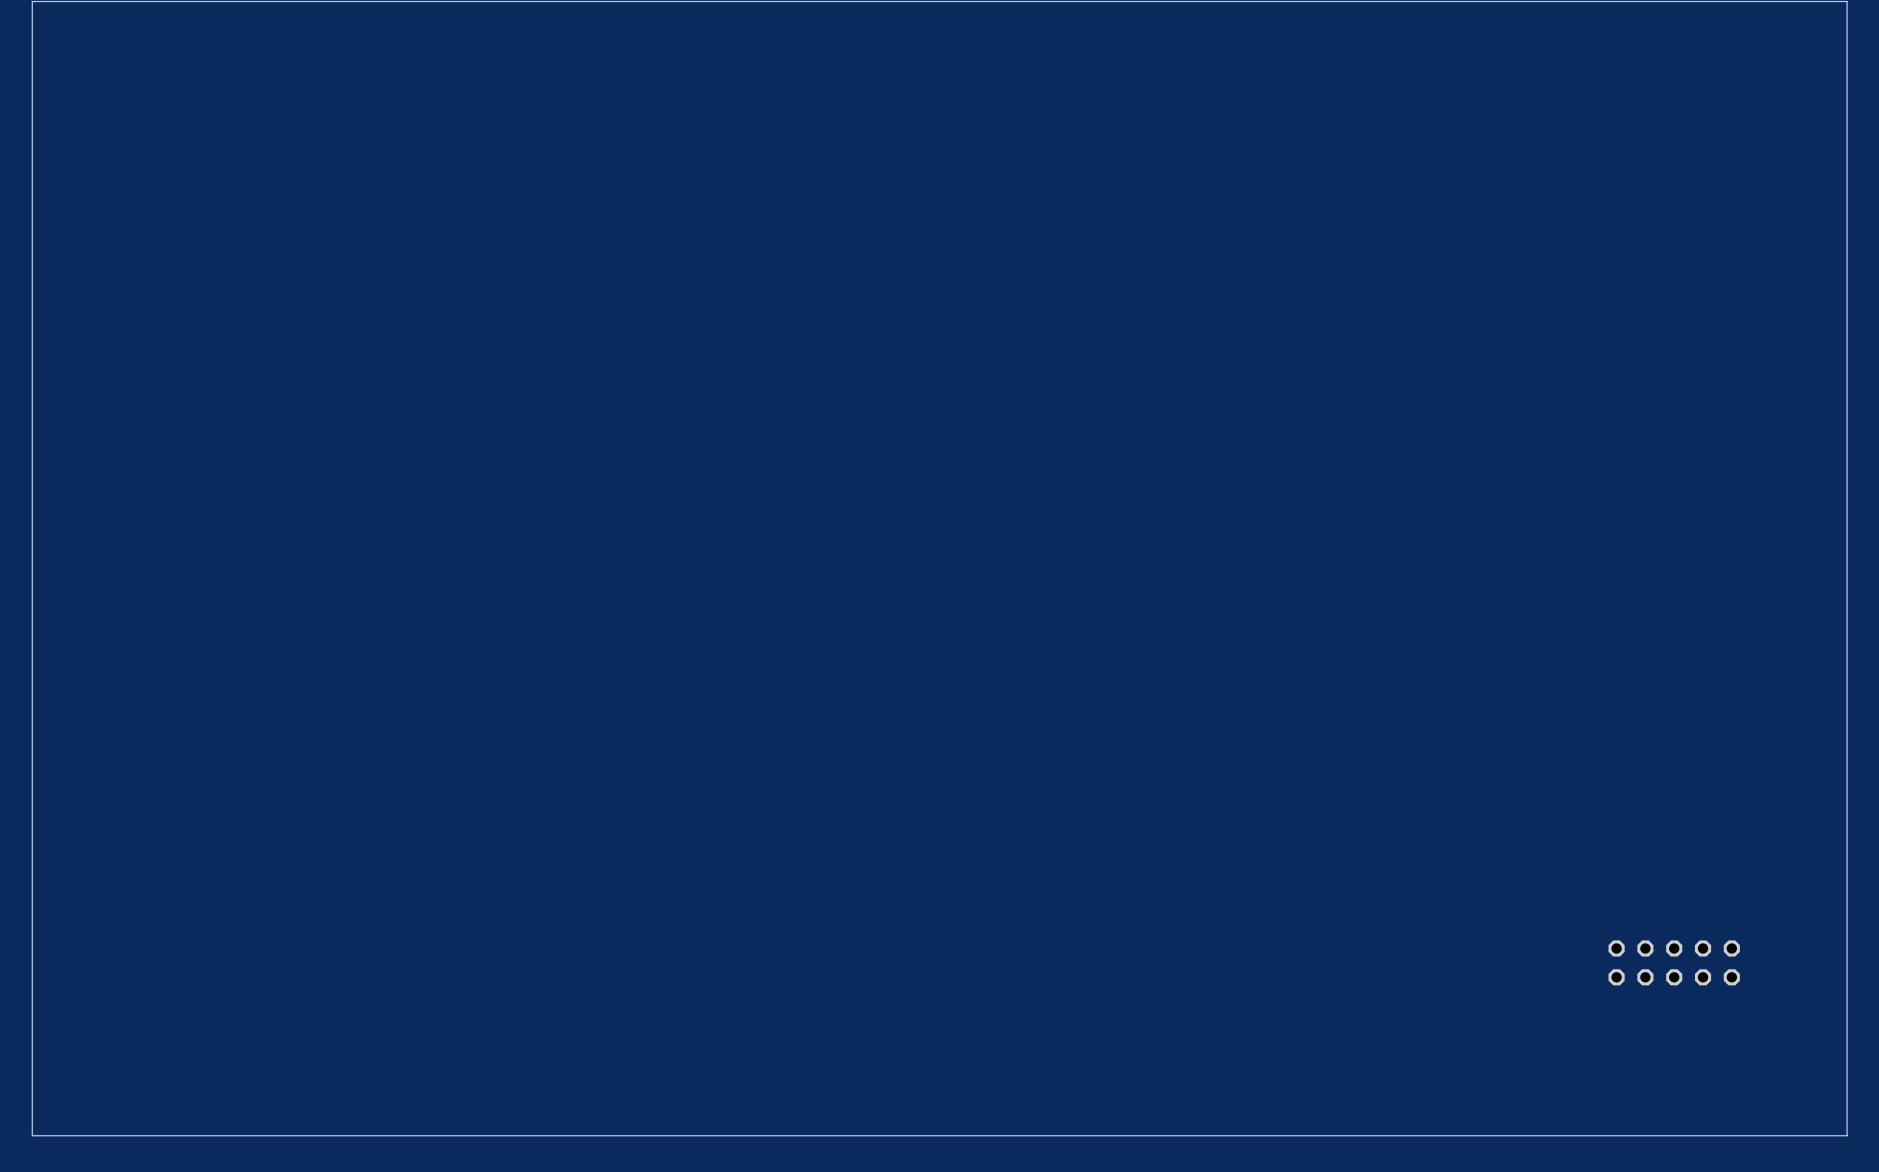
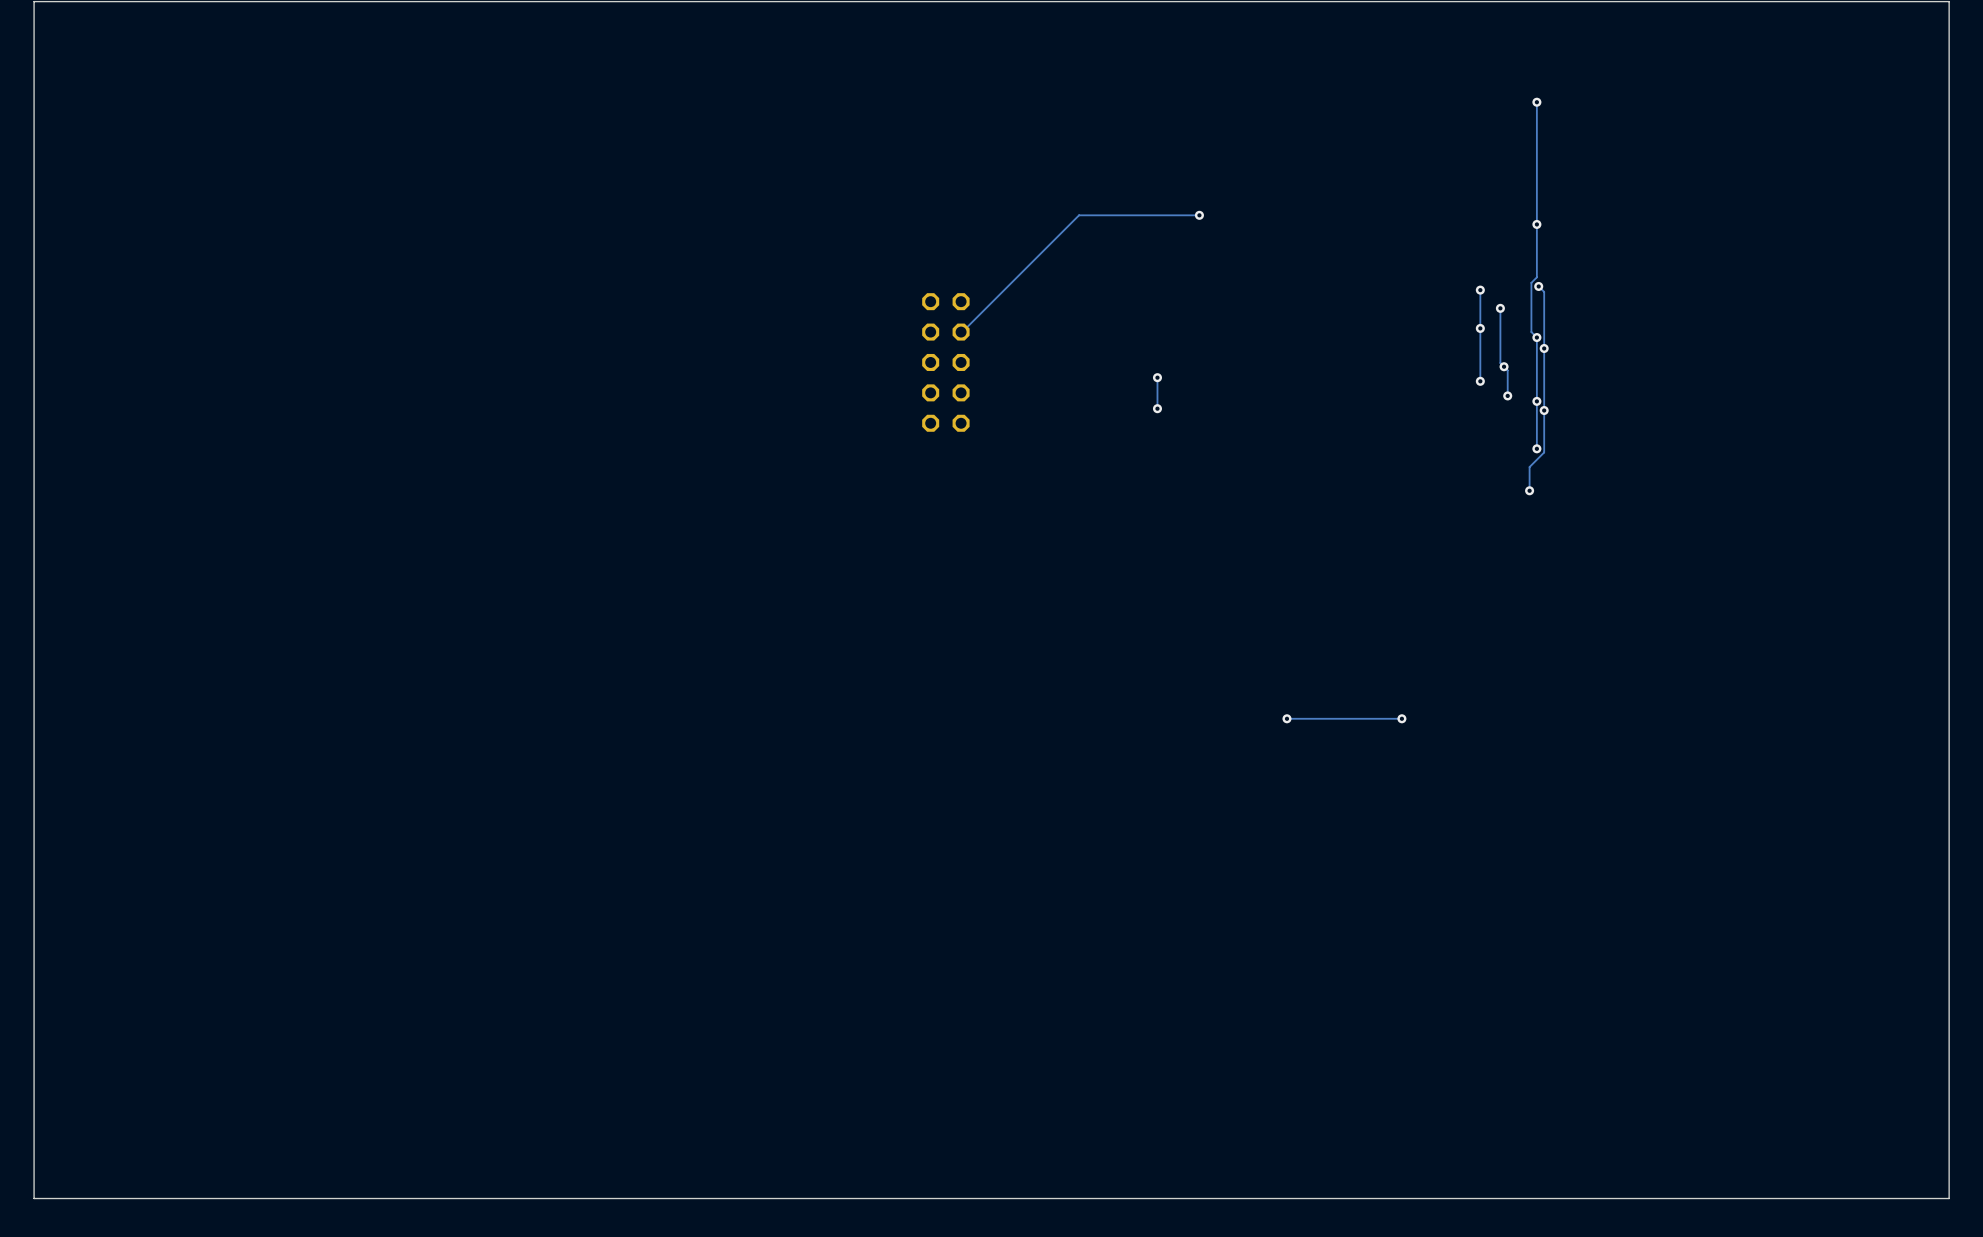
track: none -> (1536, 102) (1536, 277) (1531, 282) (1531, 332) (1536, 337) (1536, 448)
via: none -> (1536, 102)
track: none -> (1199, 215) (1079, 215) (961, 332)
via: none -> (1199, 215)
via: none -> (1536, 224)
track: none -> (1538, 286) (1544, 291) (1544, 452) (1529, 467) (1529, 490)
via: none -> (1538, 286)
track: none -> (1480, 290) (1480, 381)
via: none -> (1480, 290)
track: none -> (1500, 308) (1500, 363) (1507, 370) (1507, 395)
via: none -> (1500, 308)
via: none -> (1480, 328)
via: none -> (1536, 337)
via: none -> (1544, 348)
part: none -> (945, 362)
via: none -> (1504, 366)
track: none -> (1157, 377) (1157, 408)
via: none -> (1157, 377)
via: none -> (1480, 381)
via: none -> (1507, 395)
via: none -> (1536, 401)
via: none -> (1157, 408)
via: none -> (1544, 410)
via: none -> (1536, 448)
via: none -> (1529, 490)
via: none -> (1286, 718)
track: none -> (1401, 718) (1286, 718)
via: none -> (1401, 718)
part: (1674, 962) -> none

